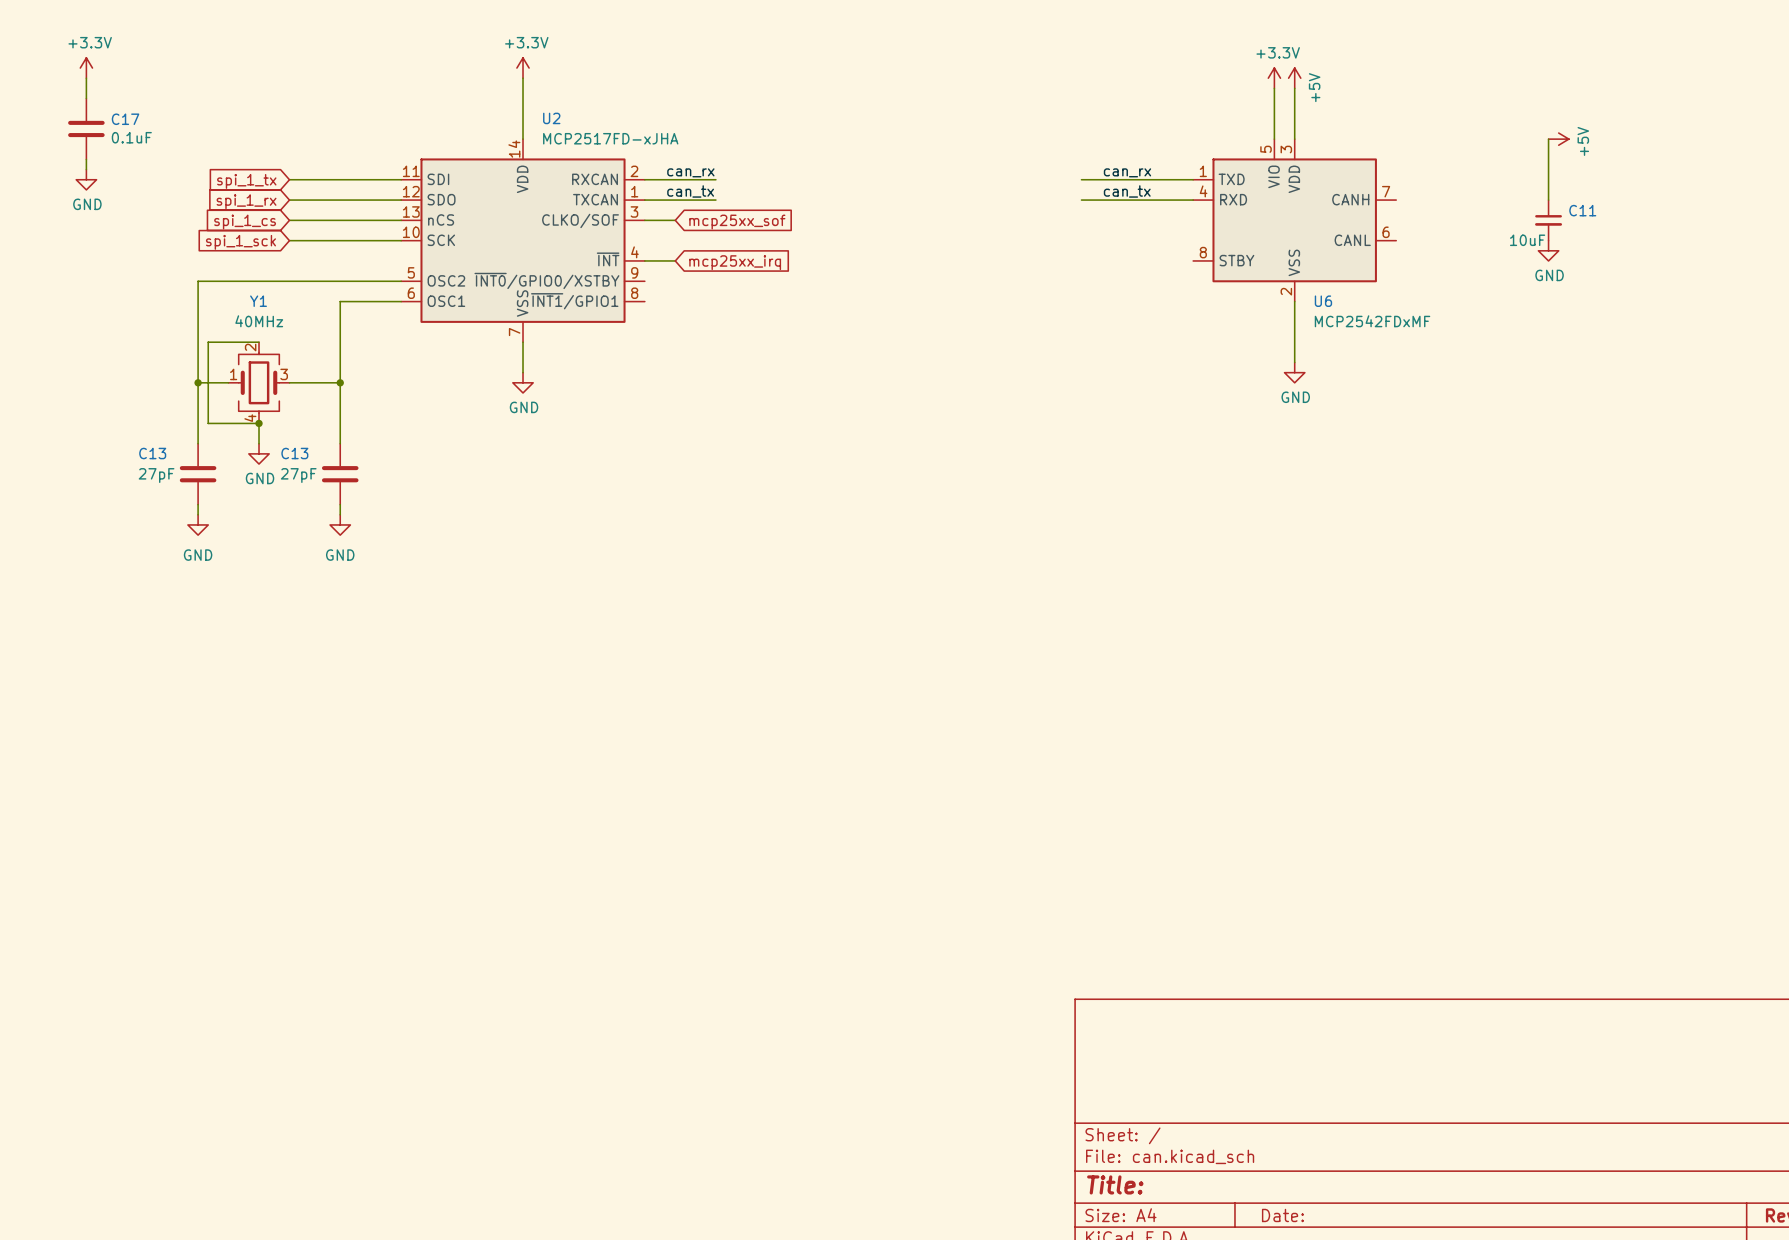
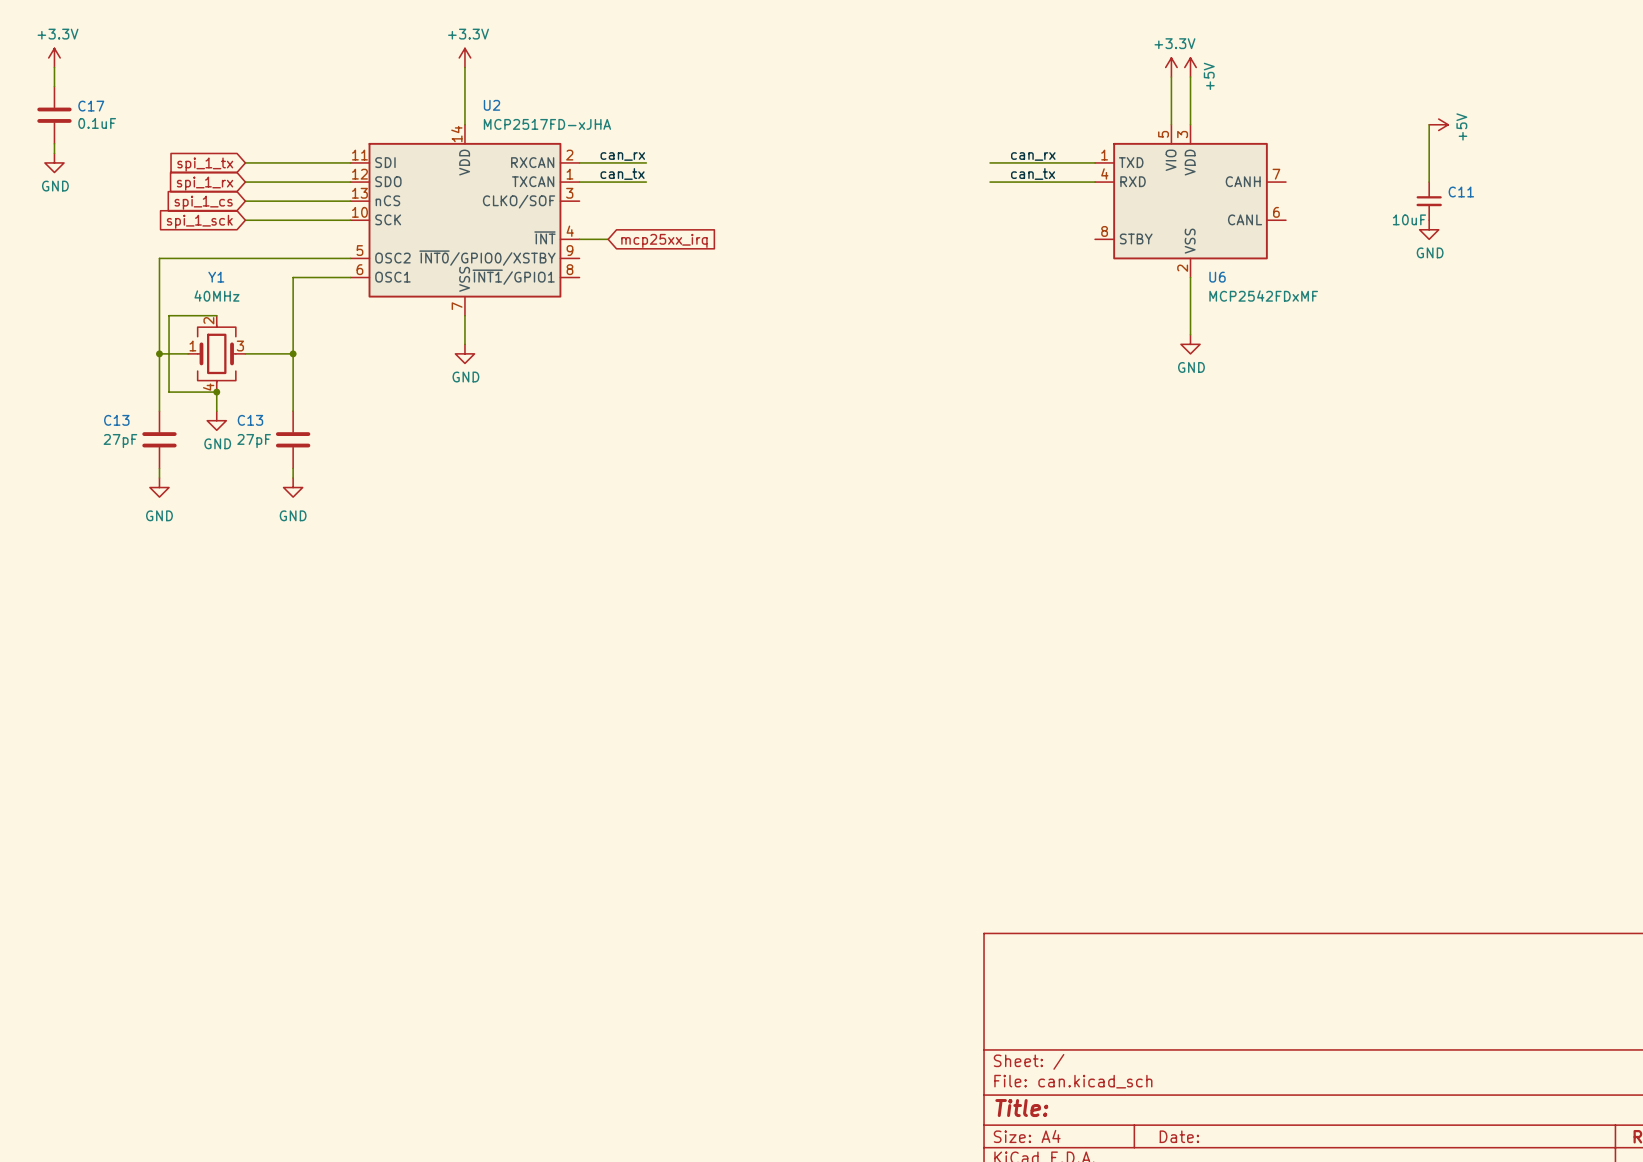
wire: (644, 220) (675, 220) -> none
global label: mcp25xx_sof (737, 222) -> none

